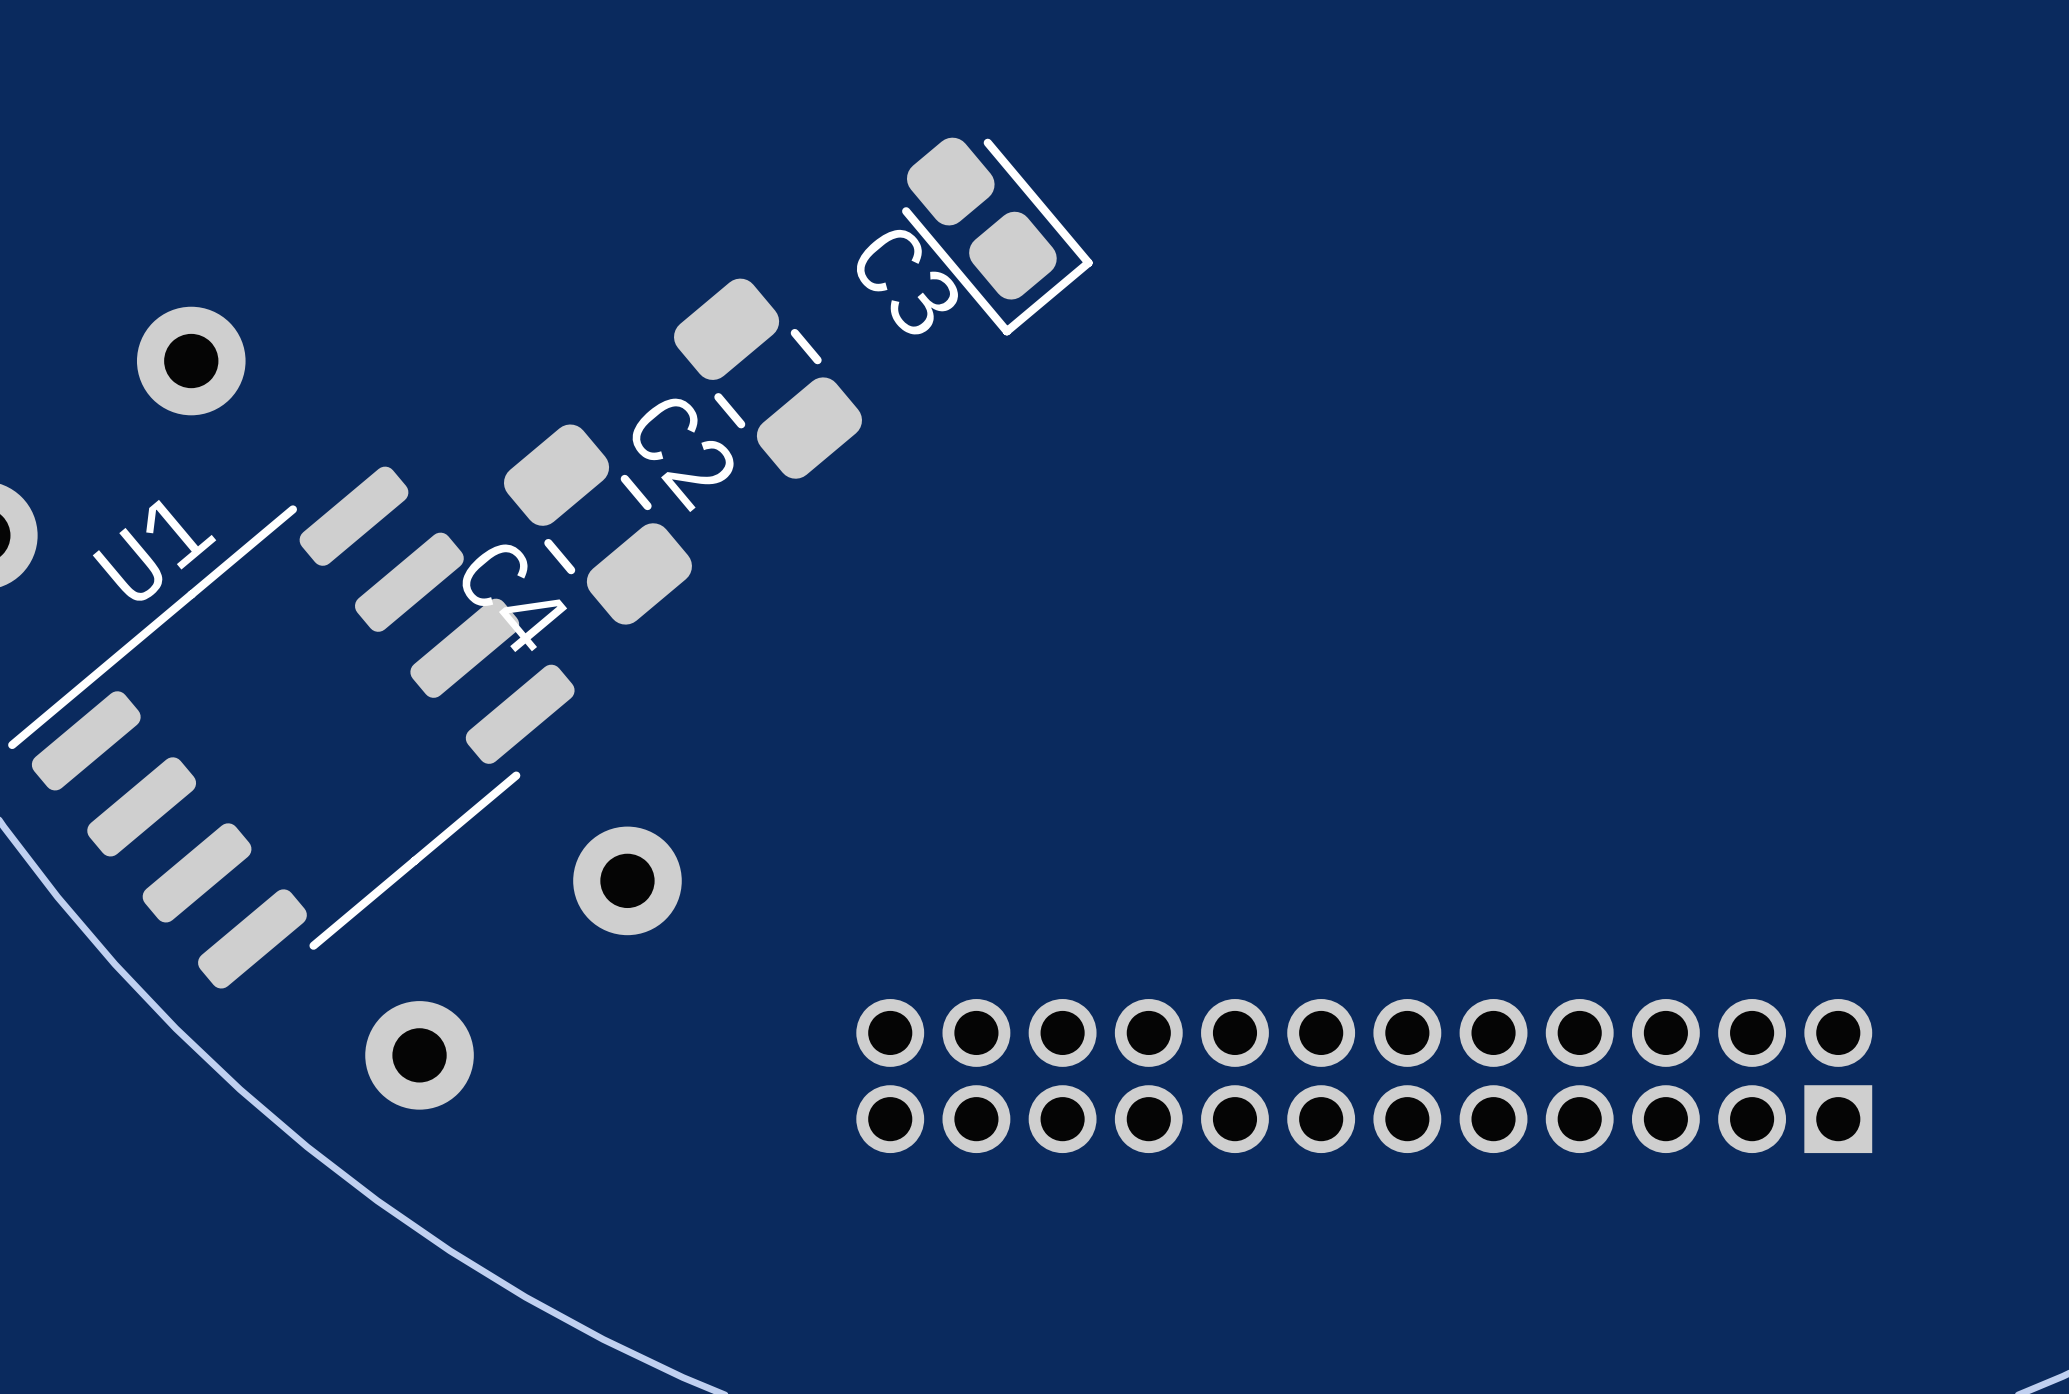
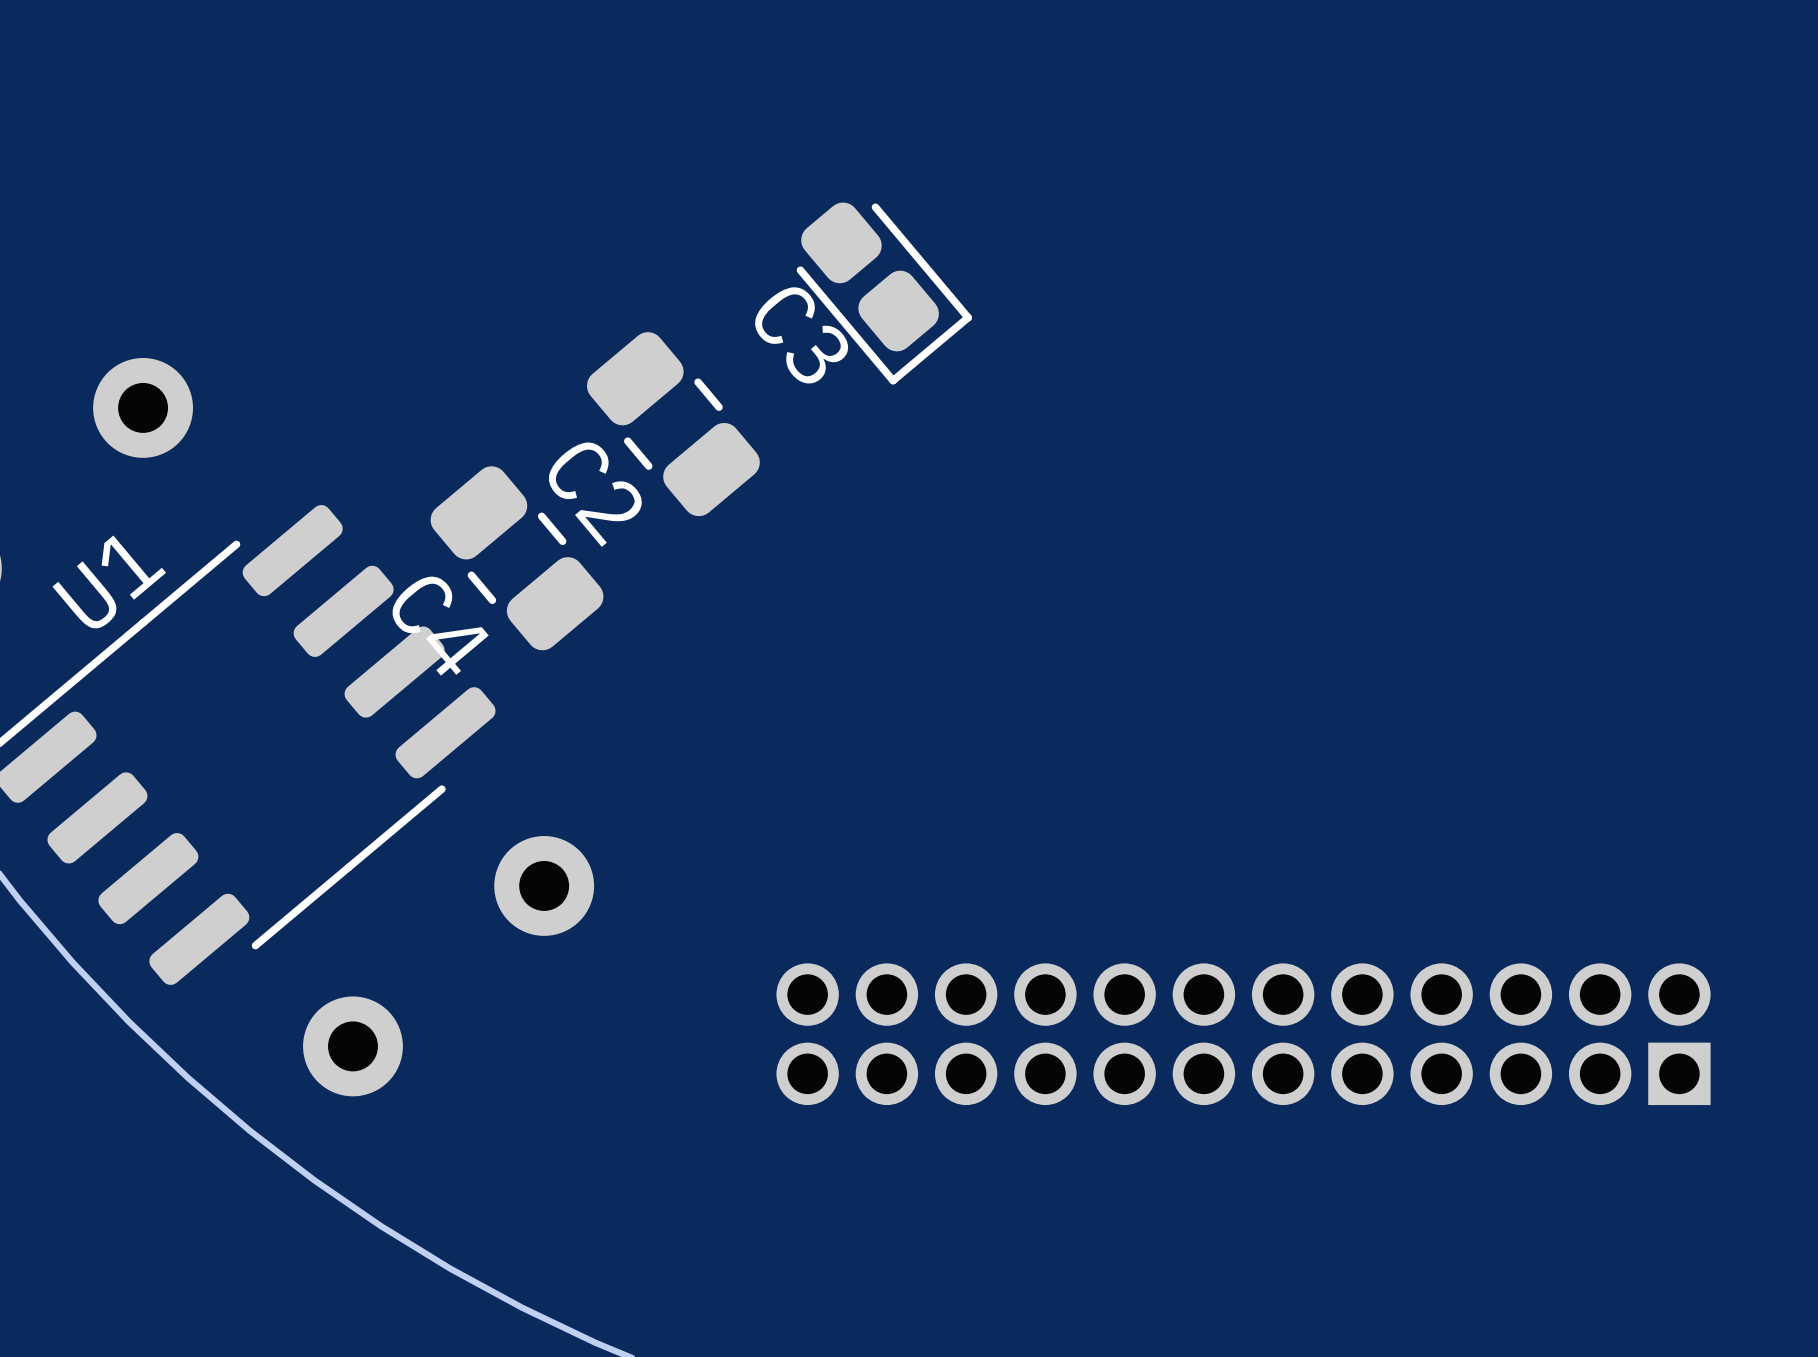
part position: (1364, 1076) -> (1243, 1034)

